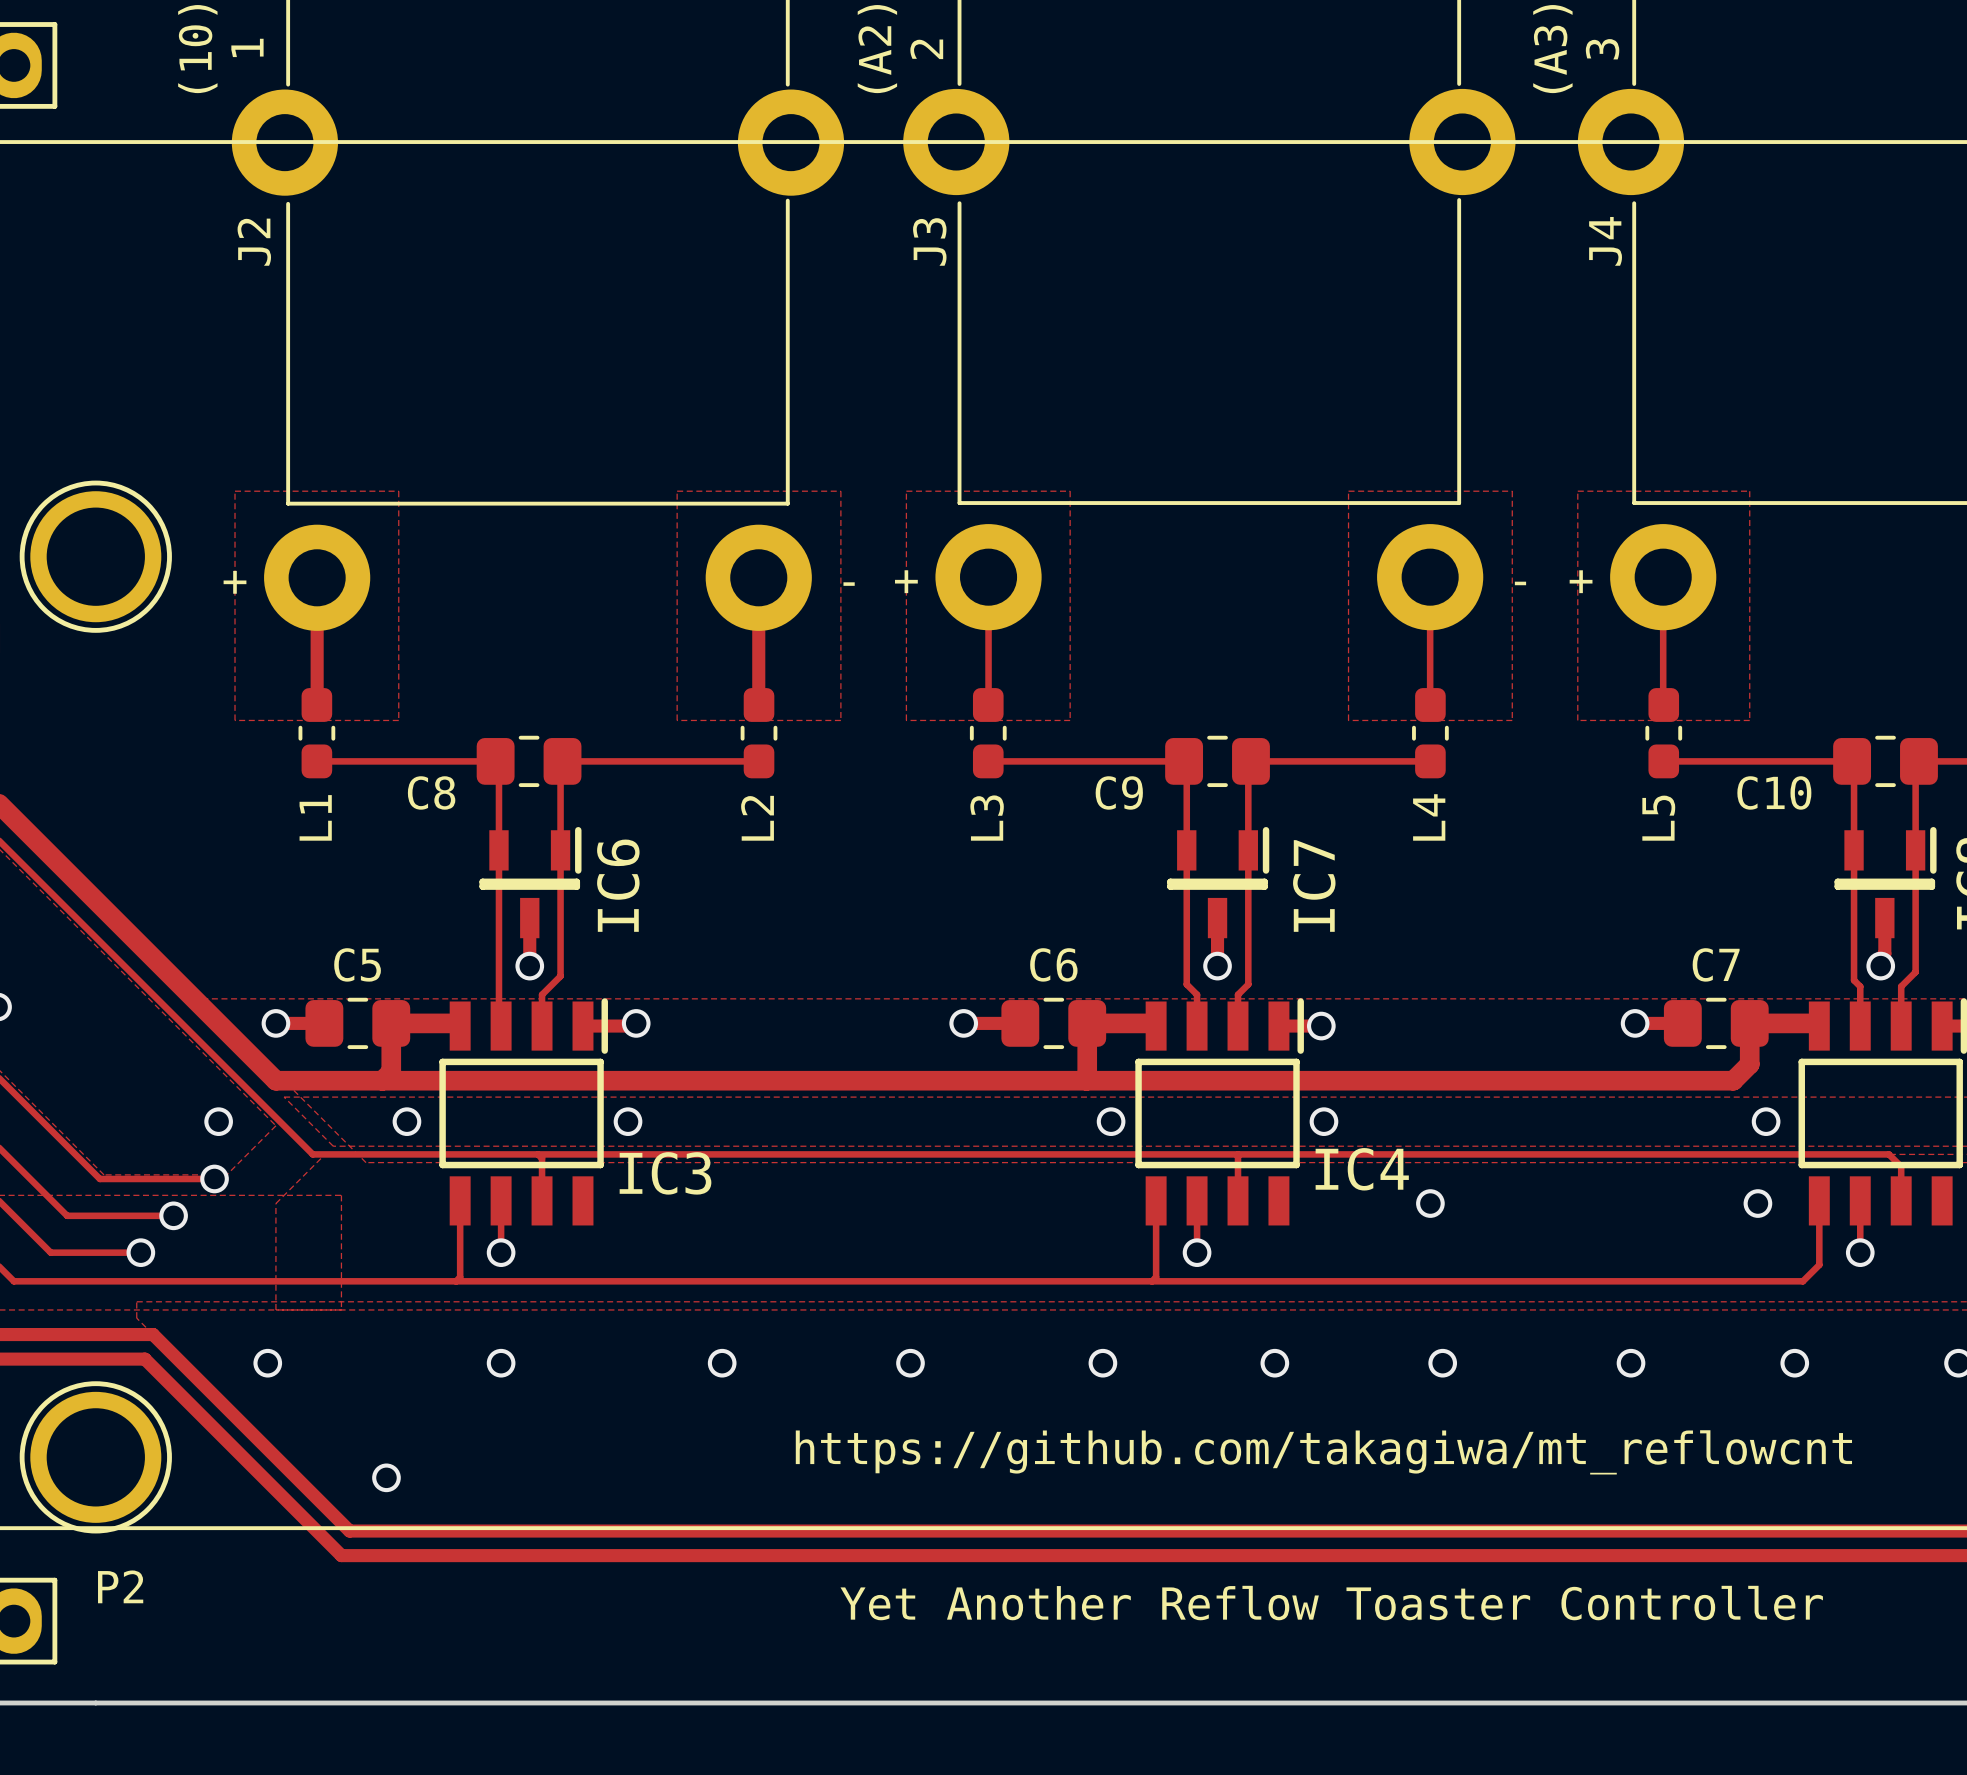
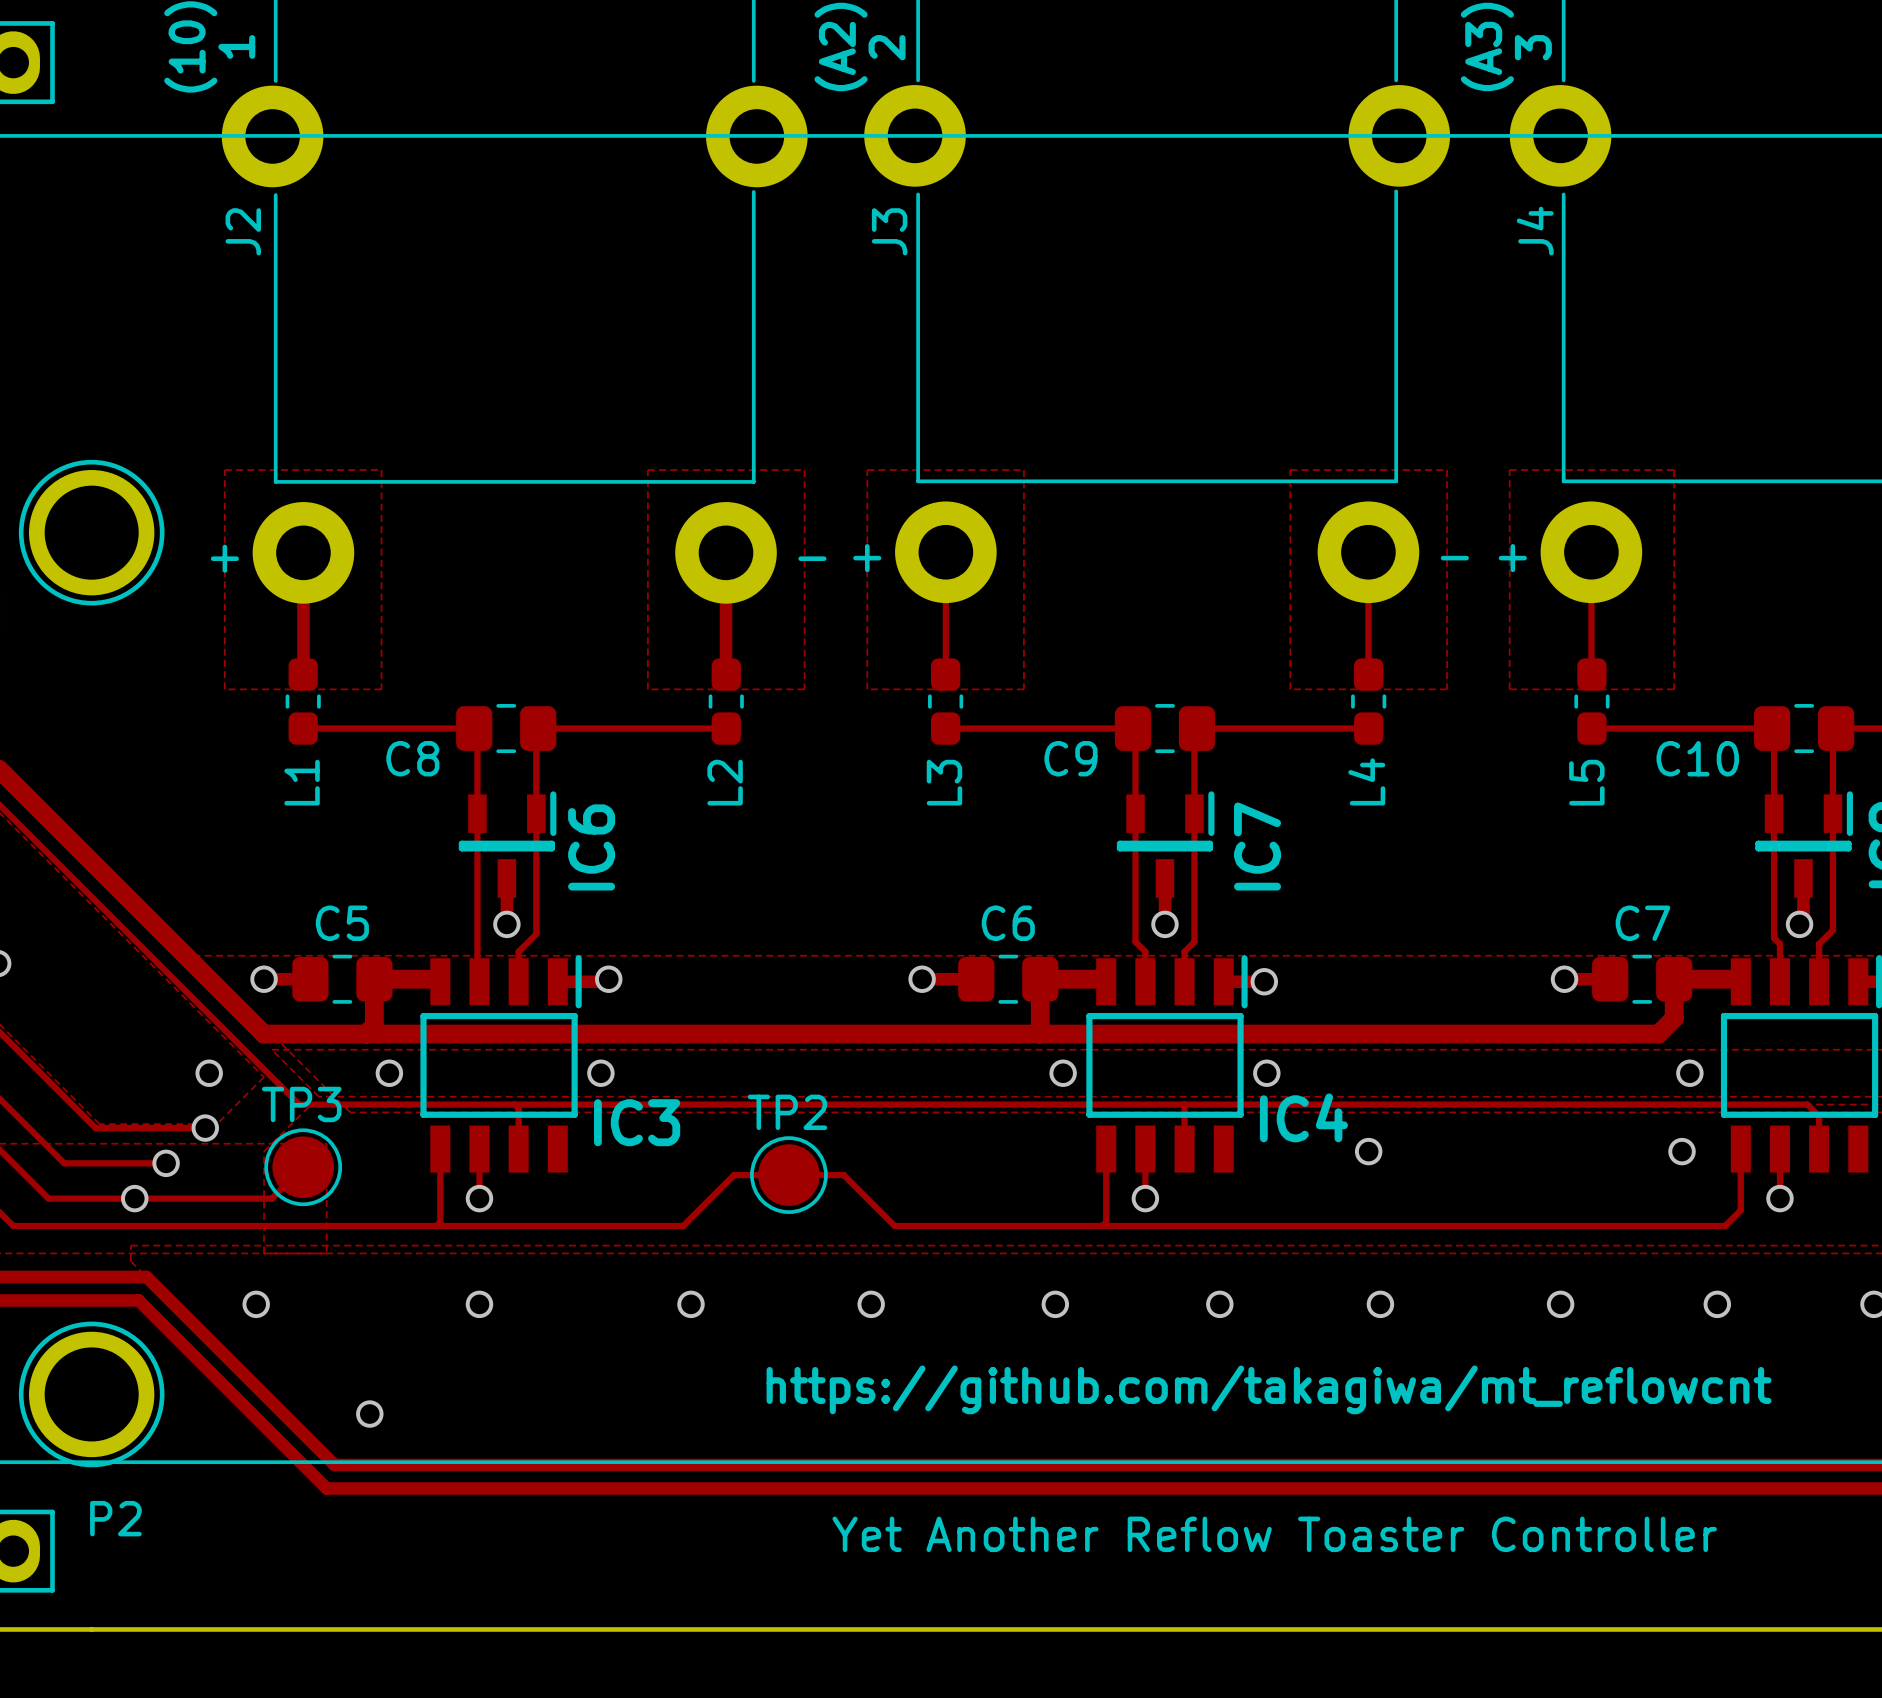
track: none -> (303, 1167) (271, 1198) (134, 1198)
TP3: none -> (303, 1167)
TP2: none -> (788, 1175)
track: (713, 1281) (935, 1281) -> (683, 1226) (734, 1175) (843, 1175) (894, 1226)

